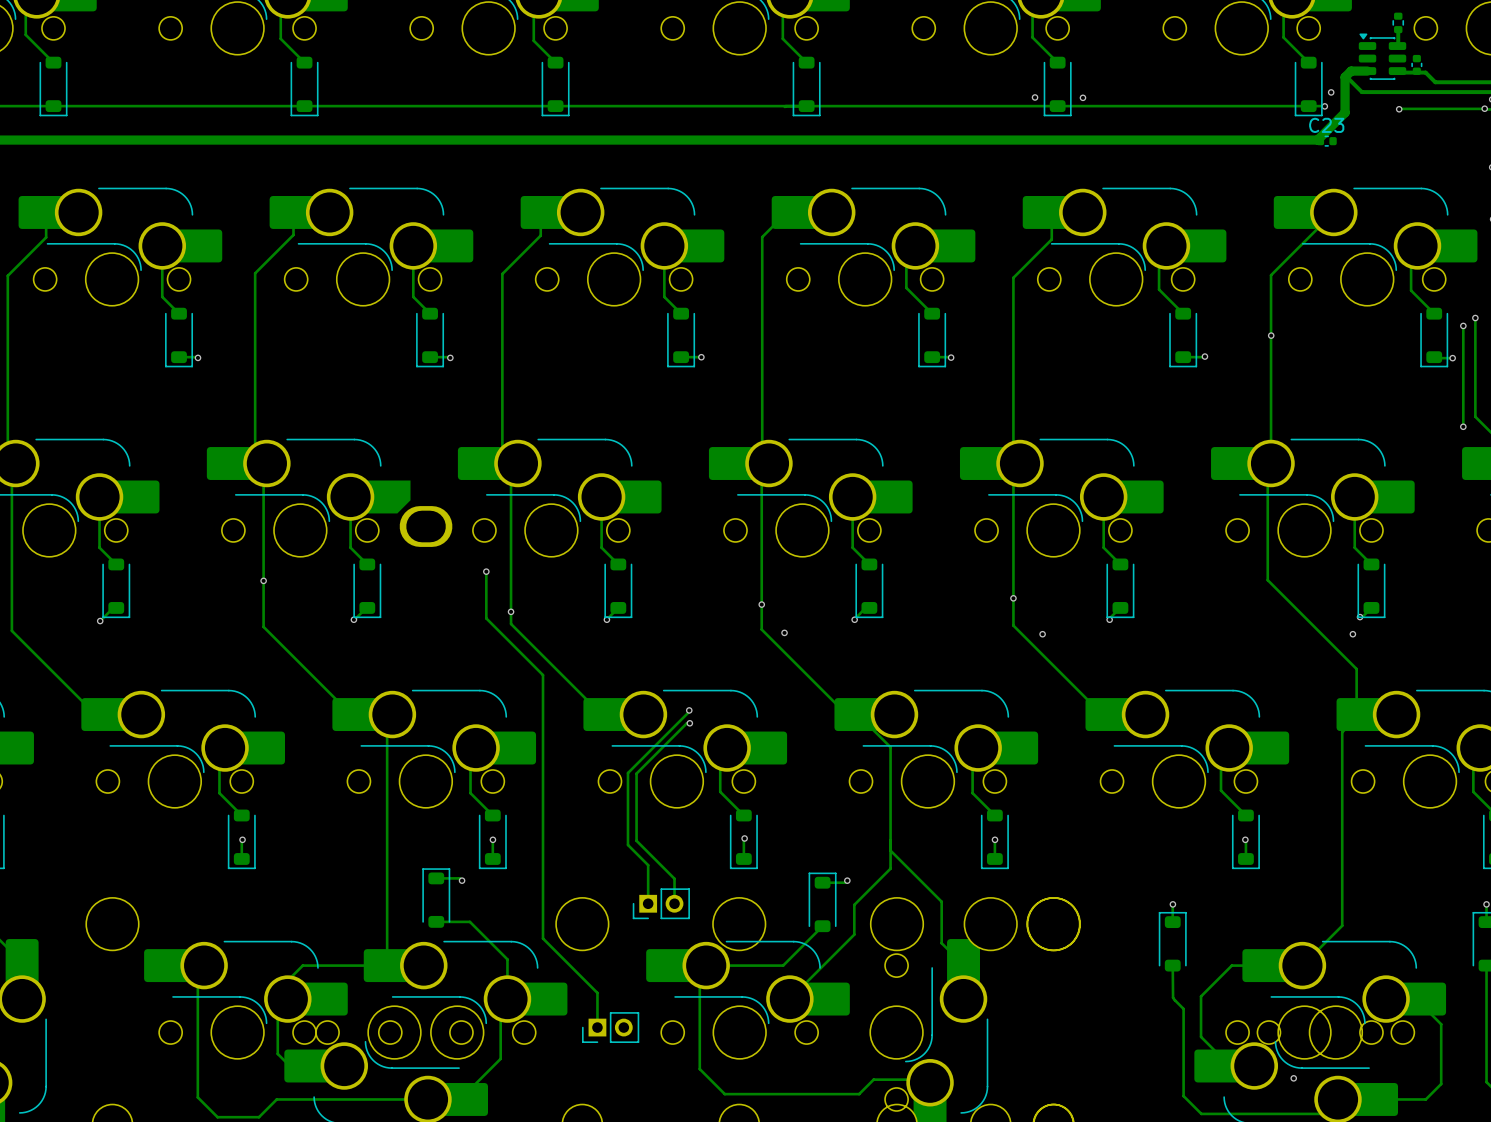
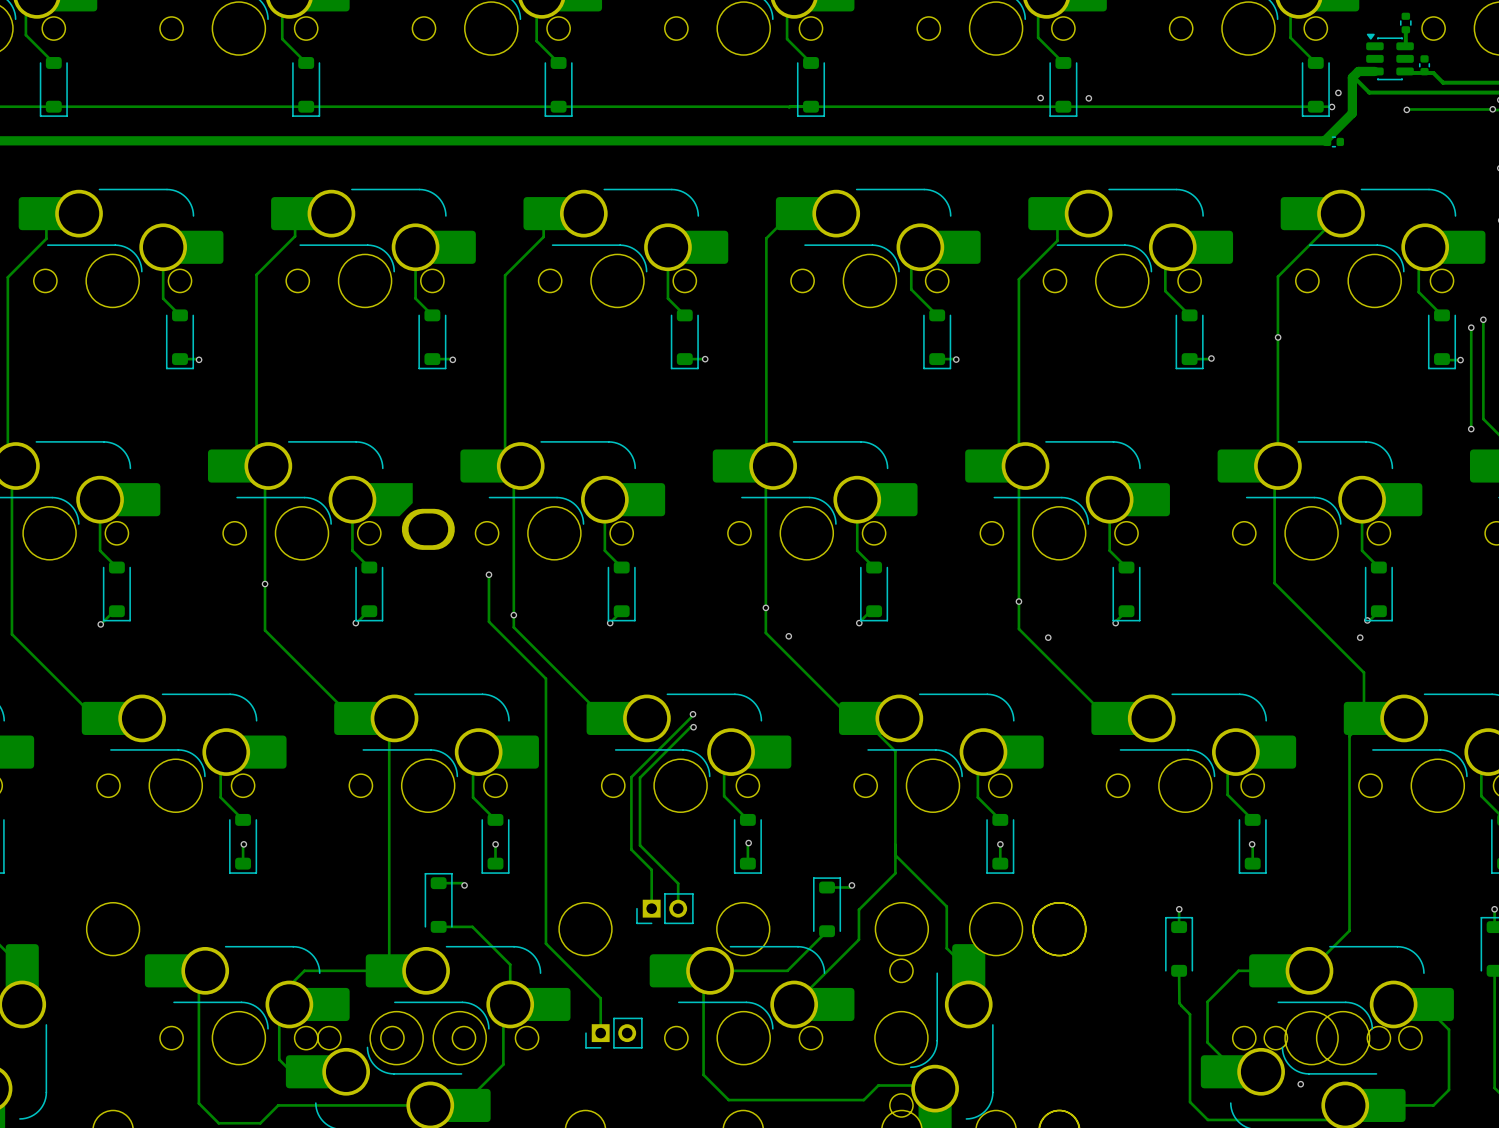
C23 name: C23 (1326, 125) -> none

